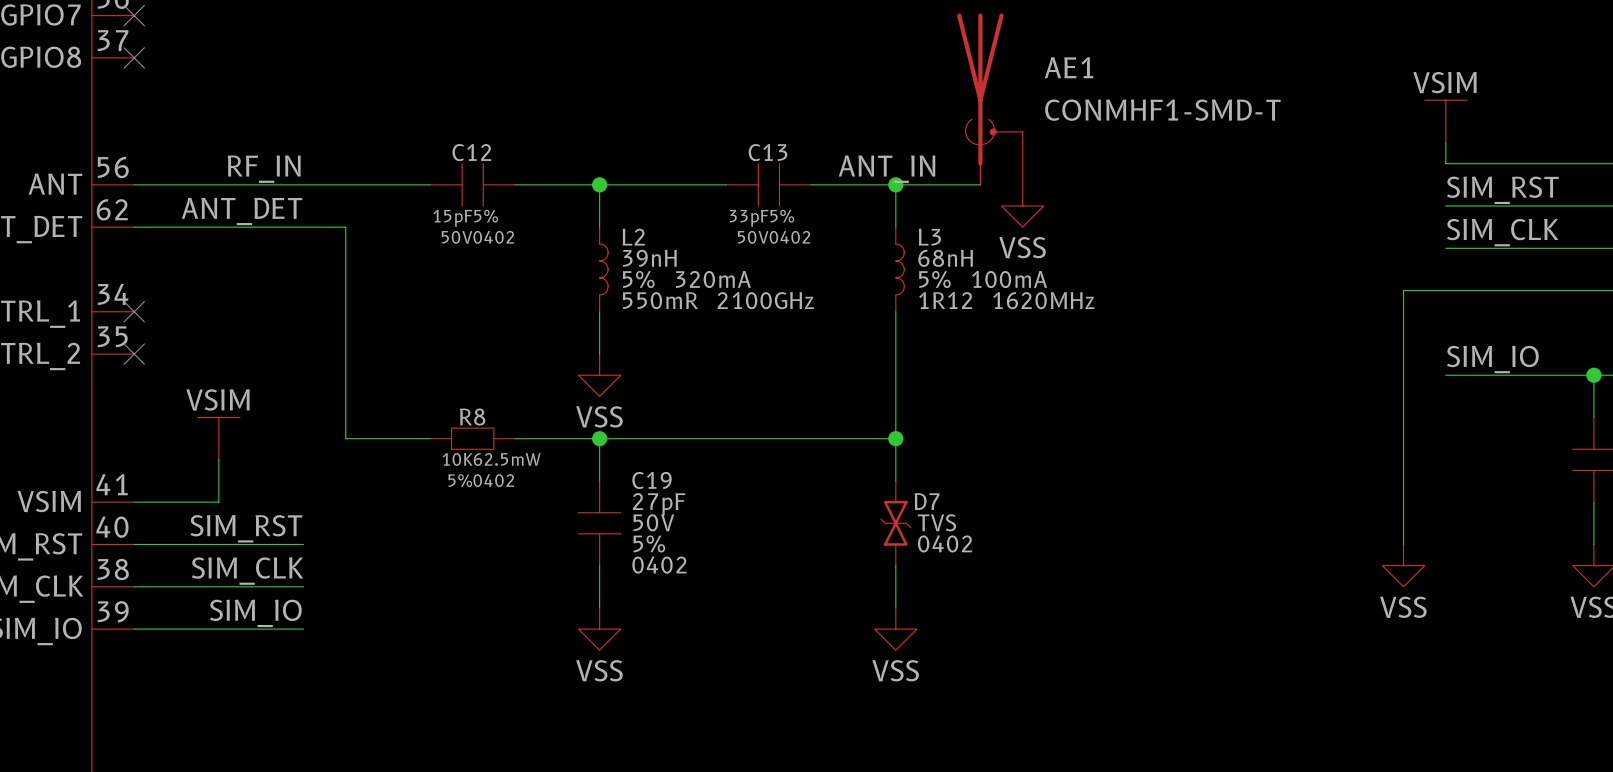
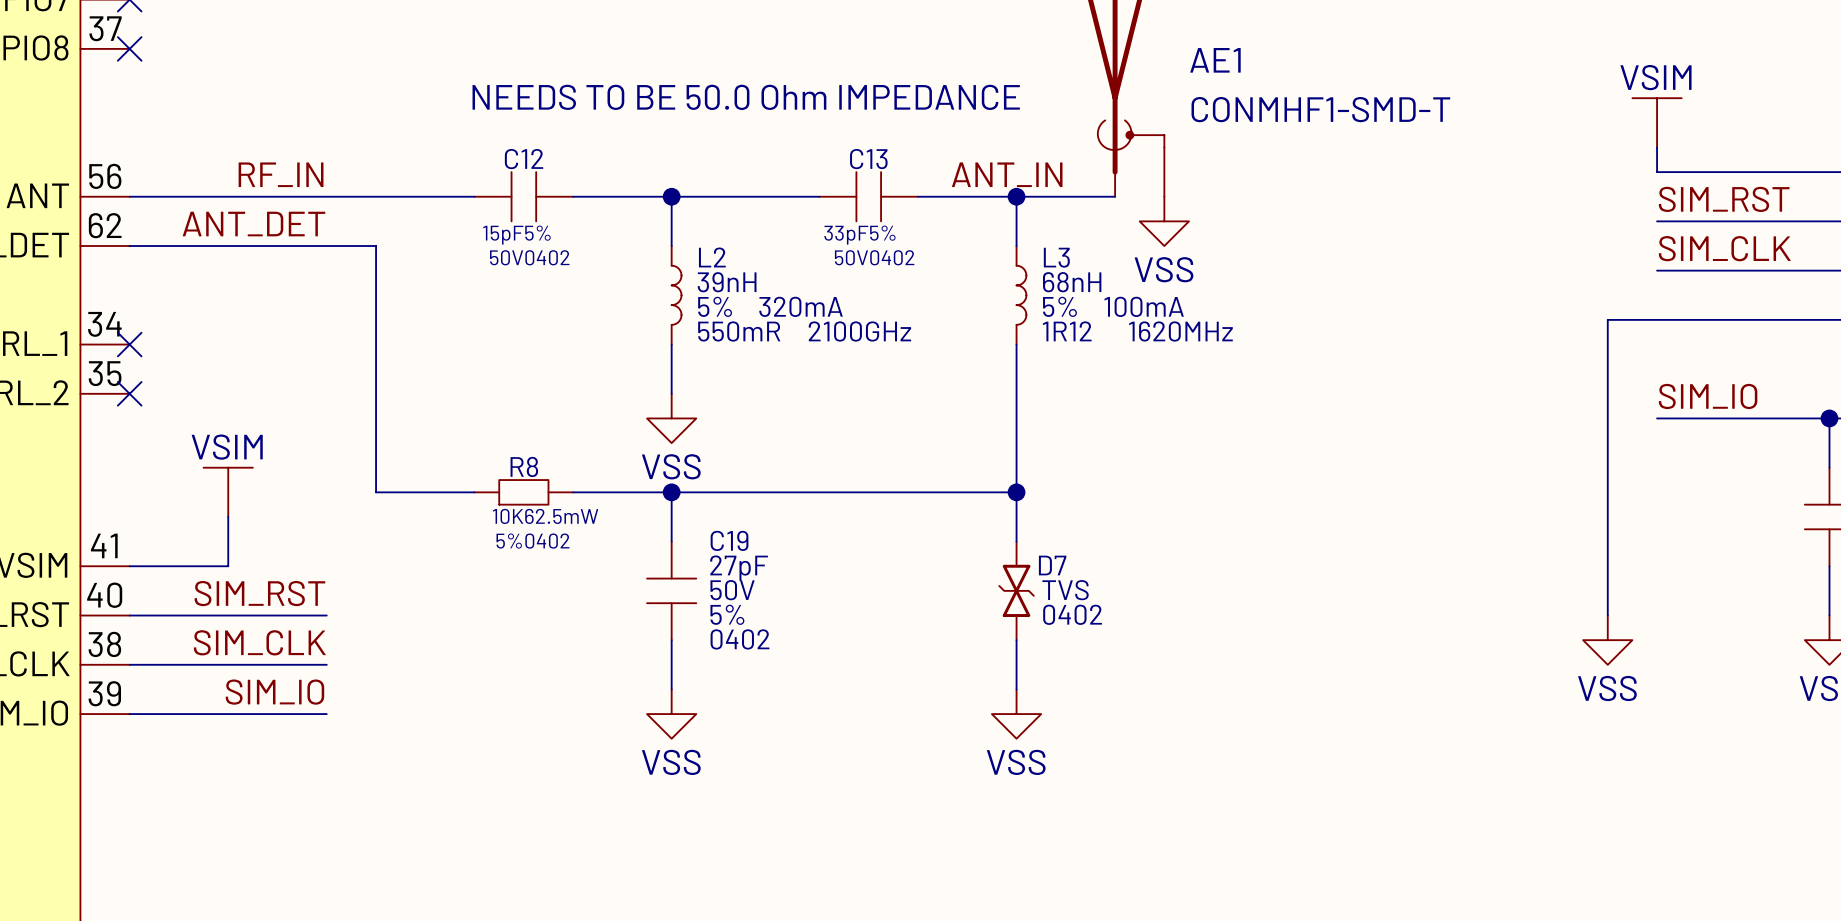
text: none -> NEEDS TO BE 50.0 Ohm IMPEDANCE (746, 97)

